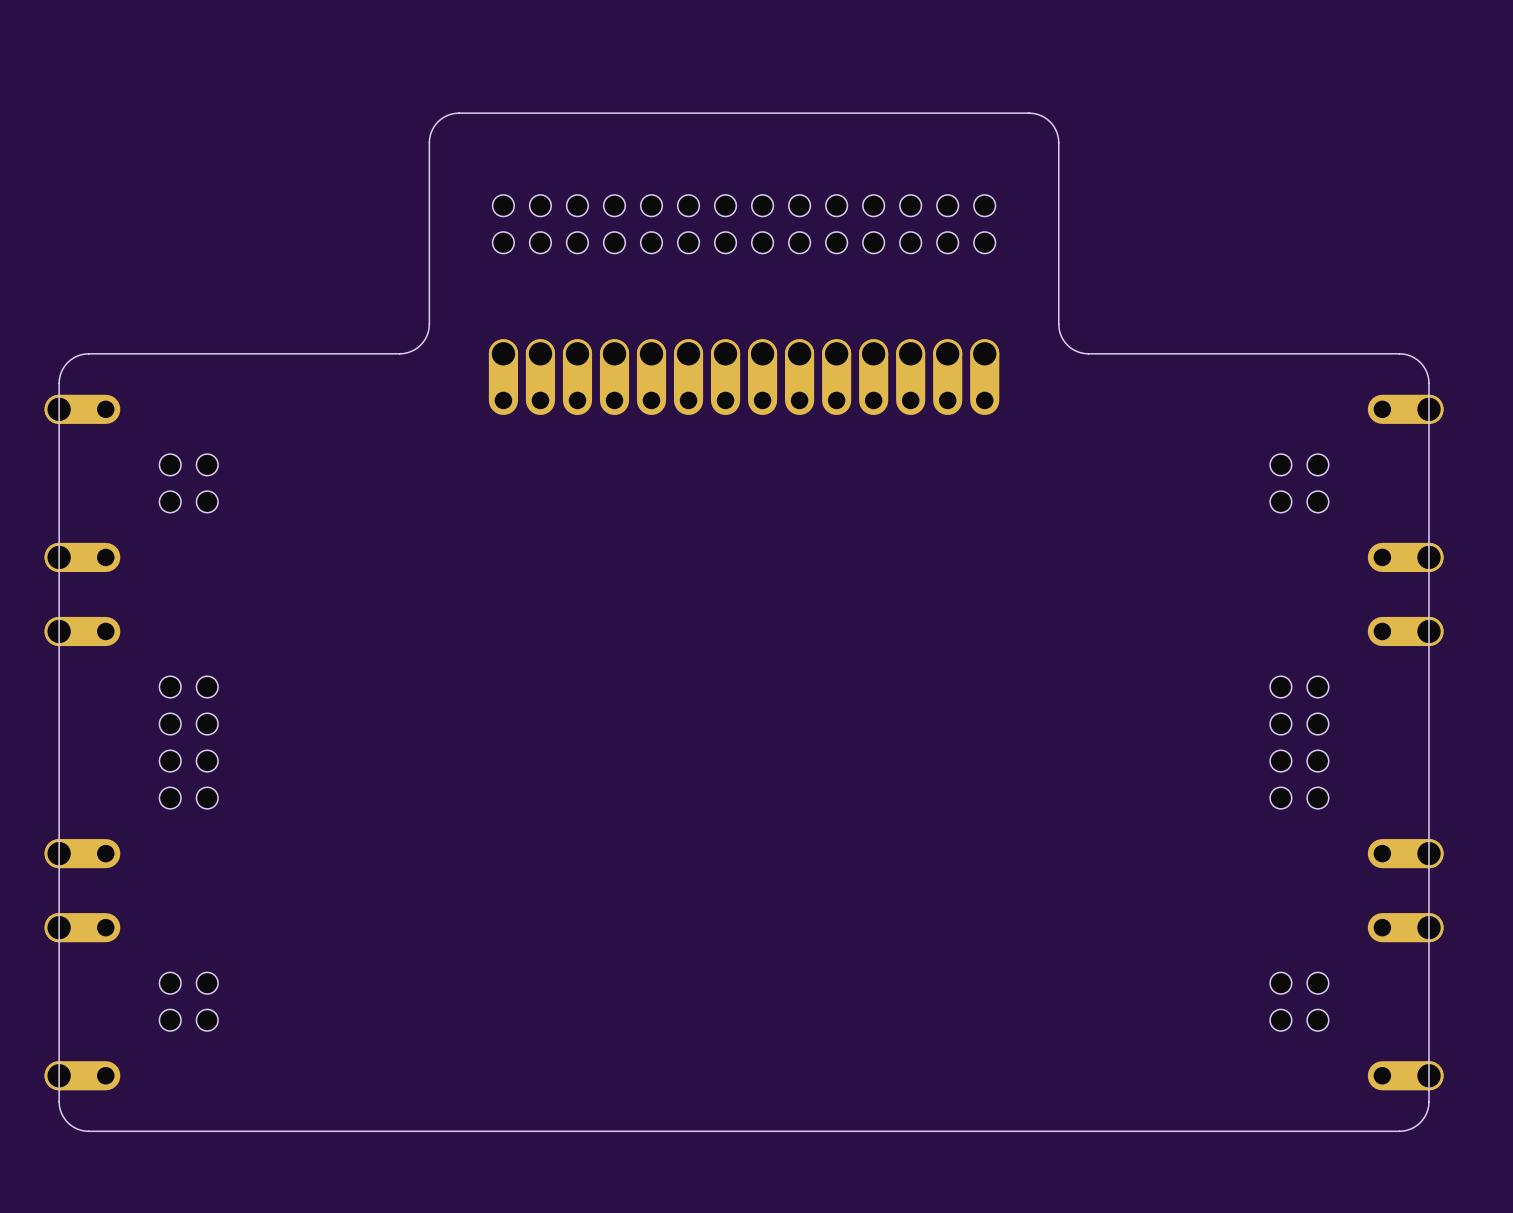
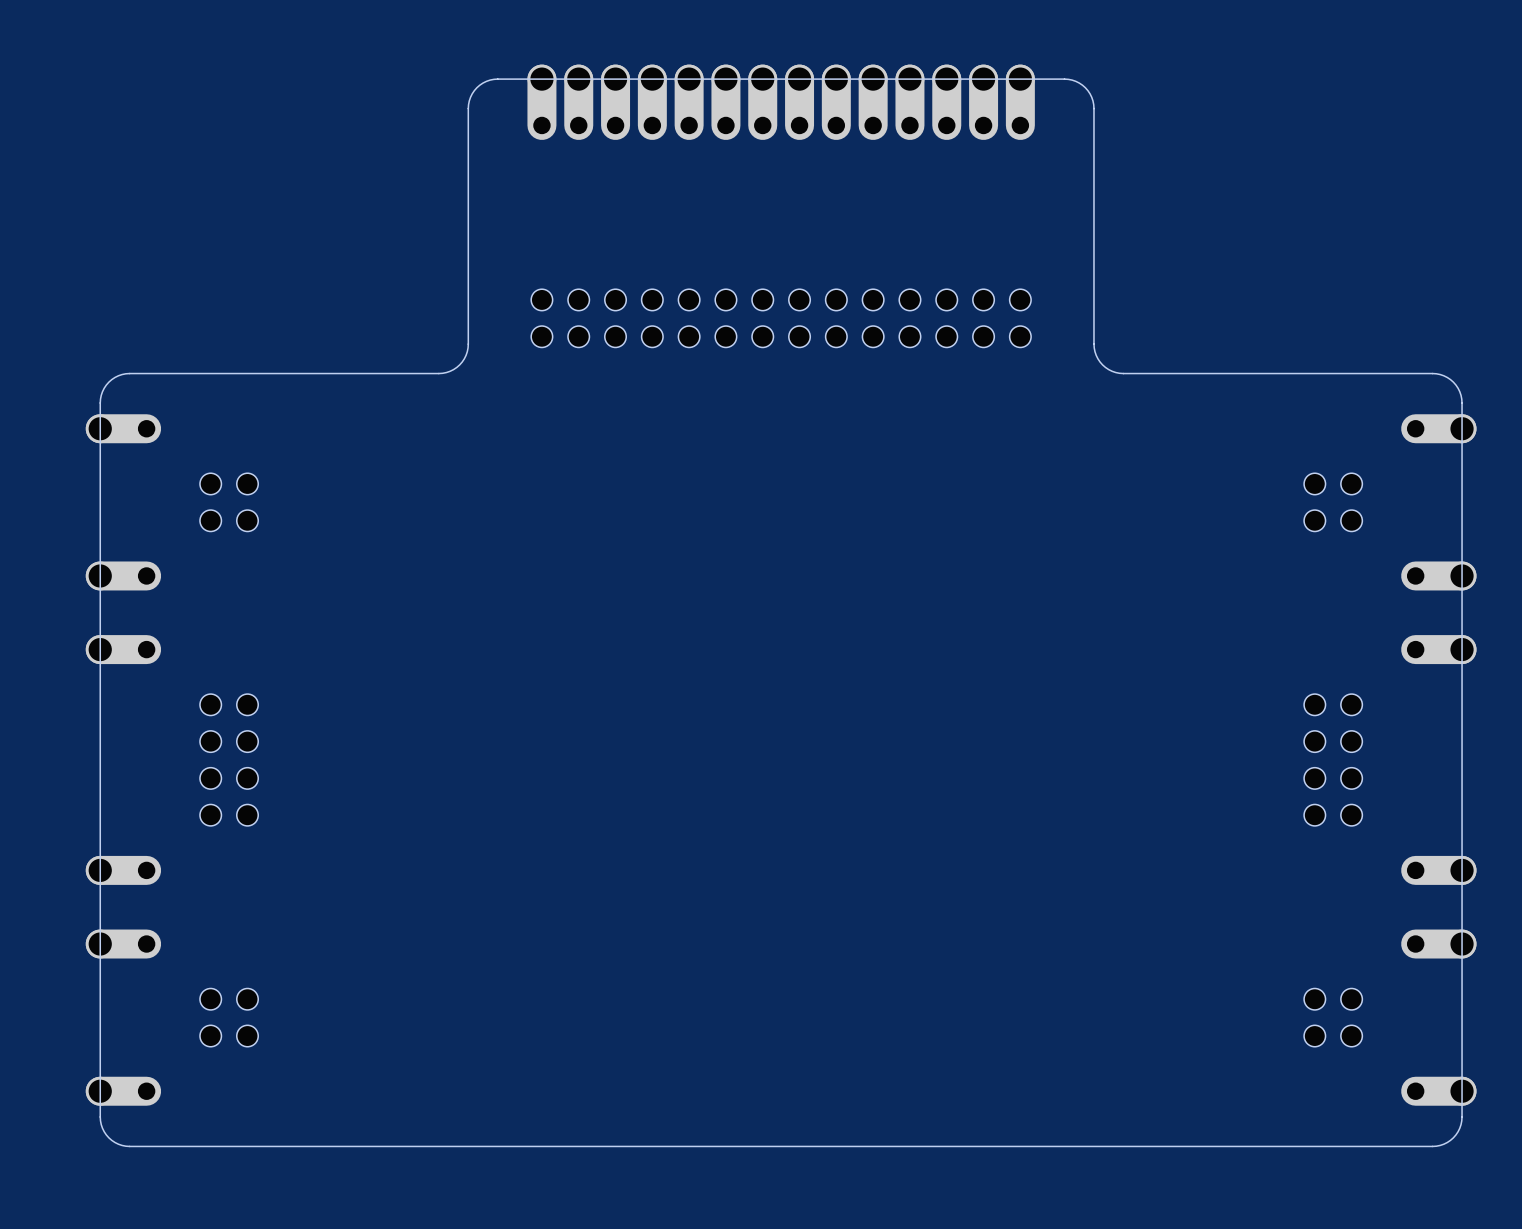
part: none -> (541, 102)
part: none -> (578, 102)
part: none -> (615, 102)
part: none -> (652, 102)
part: none -> (689, 102)
part: none -> (725, 102)
part: none -> (762, 102)
part: none -> (799, 102)
part: none -> (836, 102)
part: none -> (873, 102)
part: none -> (909, 102)
part: none -> (946, 102)
part: none -> (983, 102)
part: none -> (1020, 102)
board edge: (1058, 142) (1056, 131) (1050, 121) (1040, 115) (1029, 113) (458, 113) (447, 115) (438, 121) (431, 131) (429, 142) -> (1093, 163) (1093, 108) (1091, 97) (1082, 85) (1064, 79) (493, 79) (476, 87) (469, 100) (468, 163)
part position: (744, 224) -> (781, 318)
part: (503, 377) -> none
part: (540, 377) -> none
part: (577, 377) -> none
part: (614, 377) -> none
part: (651, 377) -> none
part: (688, 377) -> none
part: (725, 377) -> none
part: (762, 377) -> none
part: (799, 377) -> none
part: (836, 377) -> none
part: (873, 377) -> none
part: (910, 377) -> none
part: (947, 377) -> none
part: (984, 377) -> none

